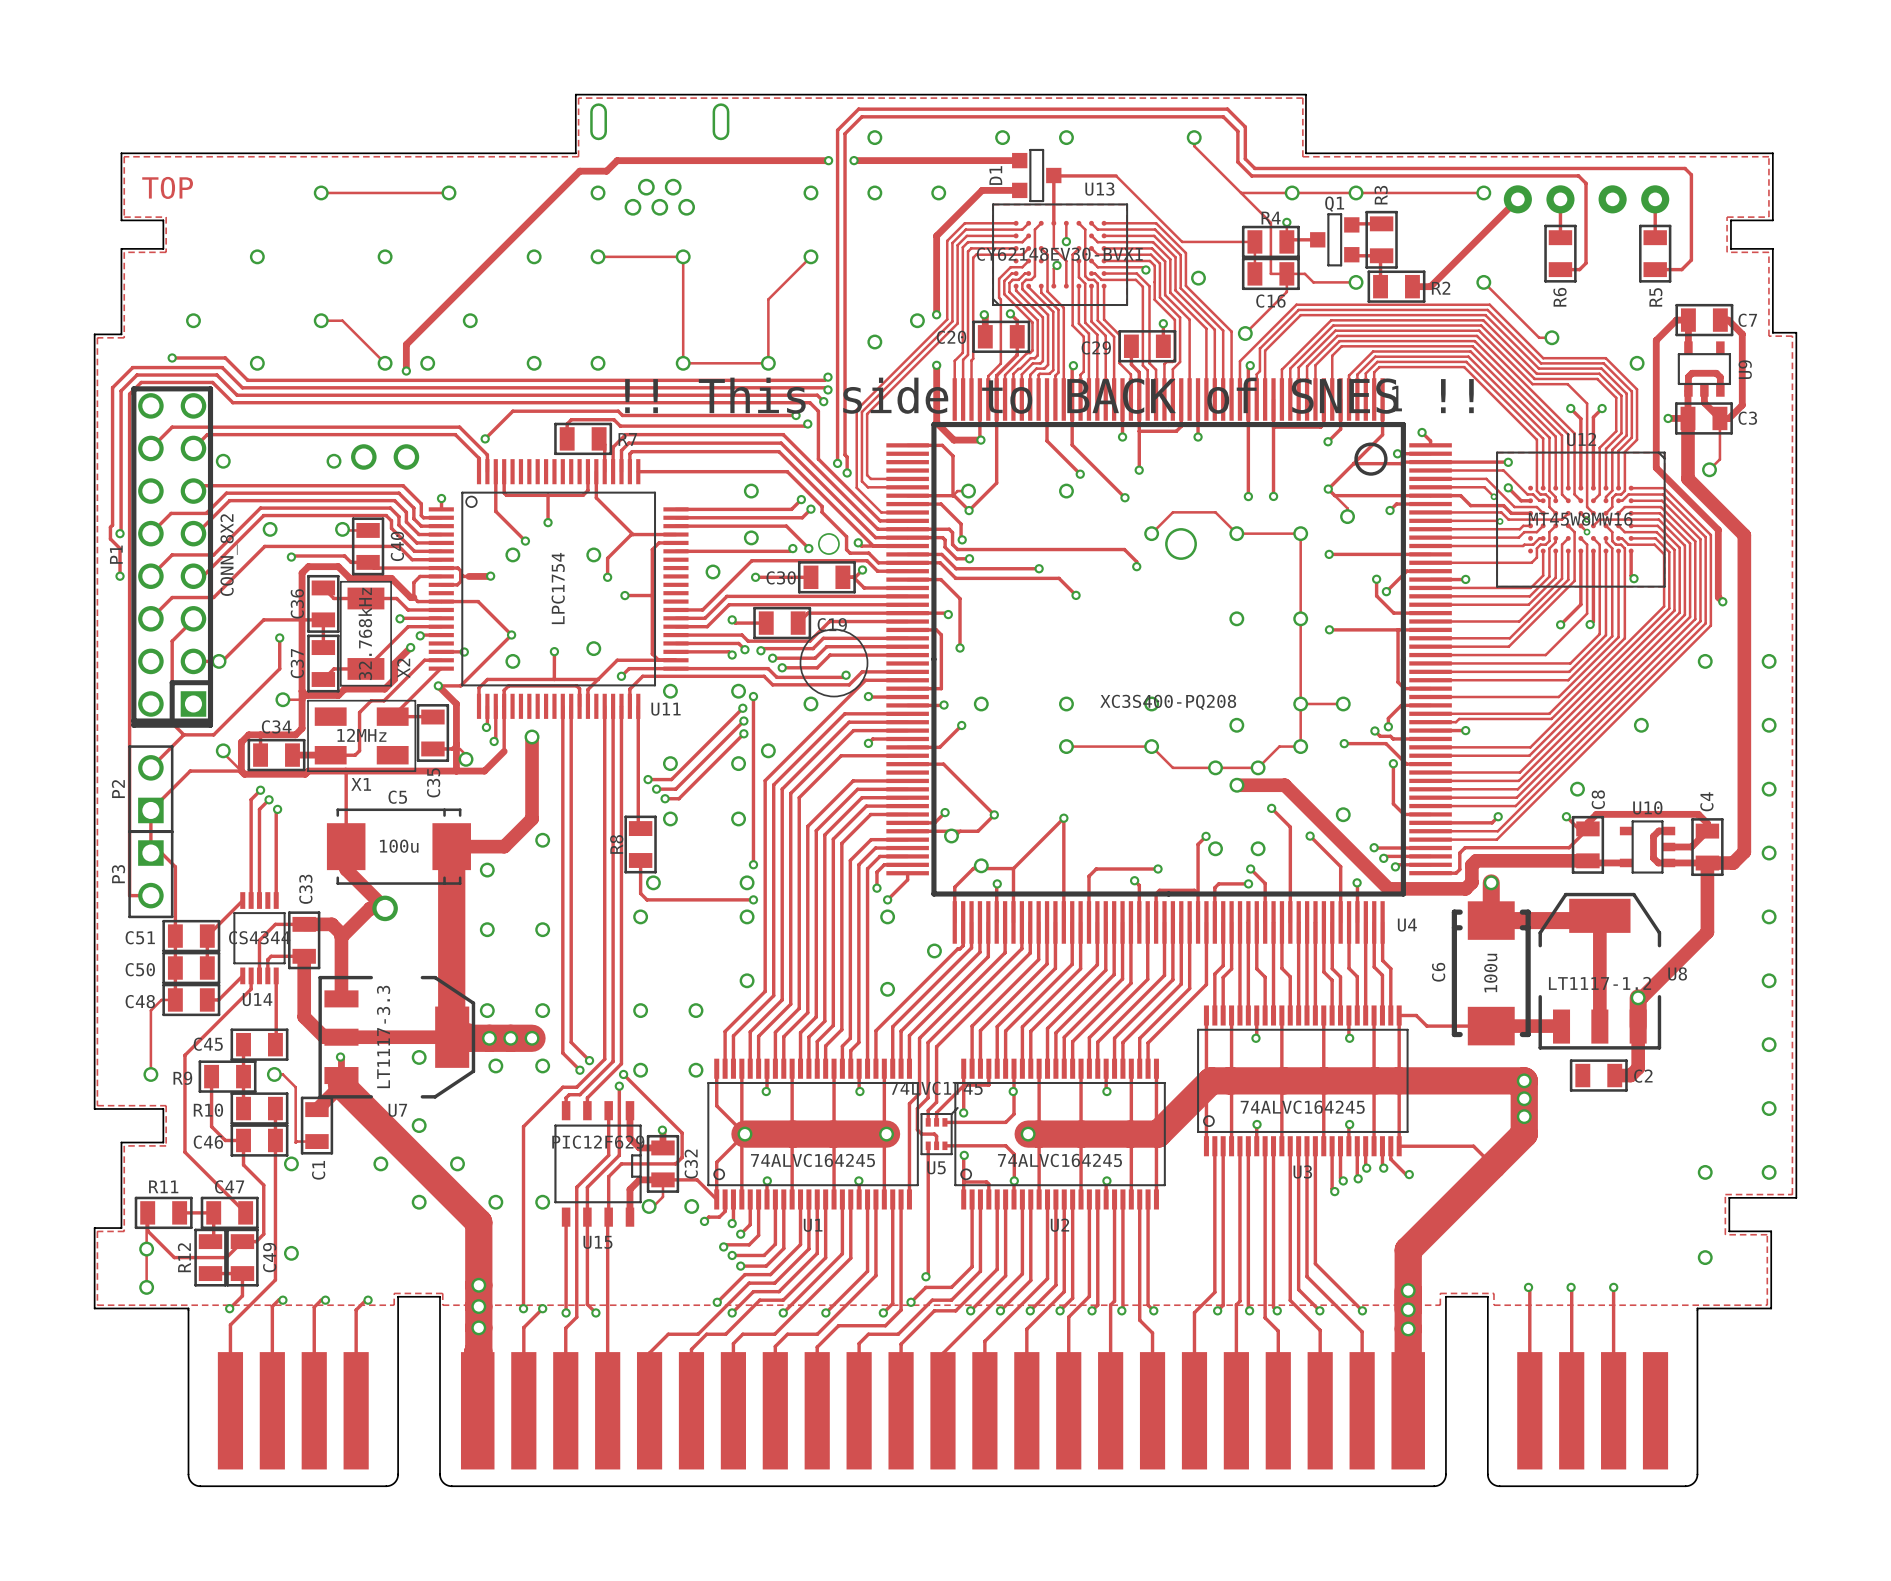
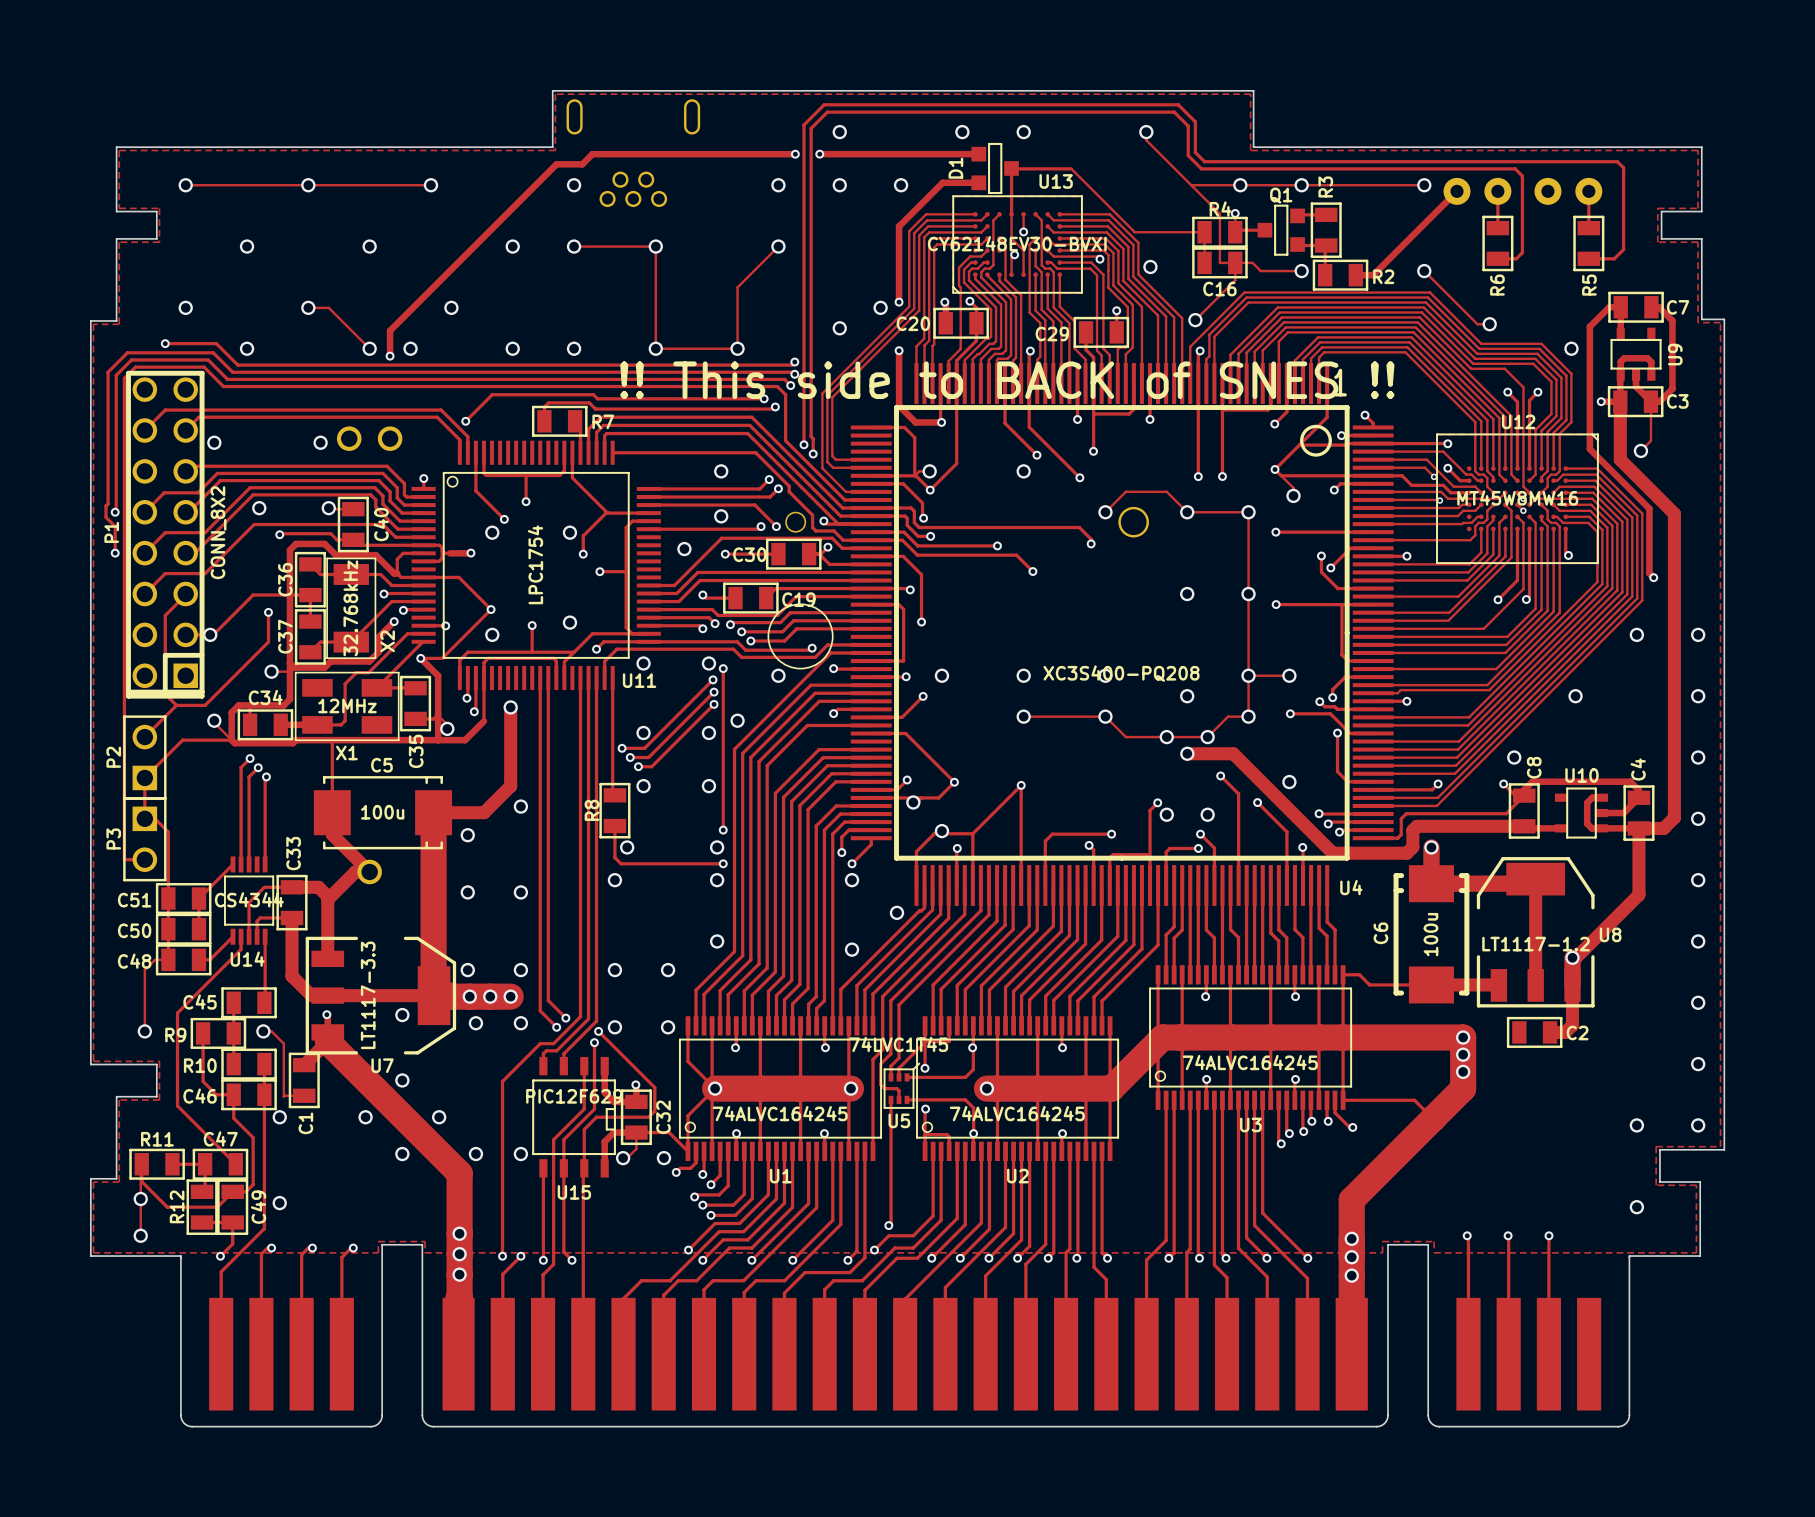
text: TOP (167, 187) -> none
track: none -> (185, 185) (308, 185)
via: none -> (185, 185)

